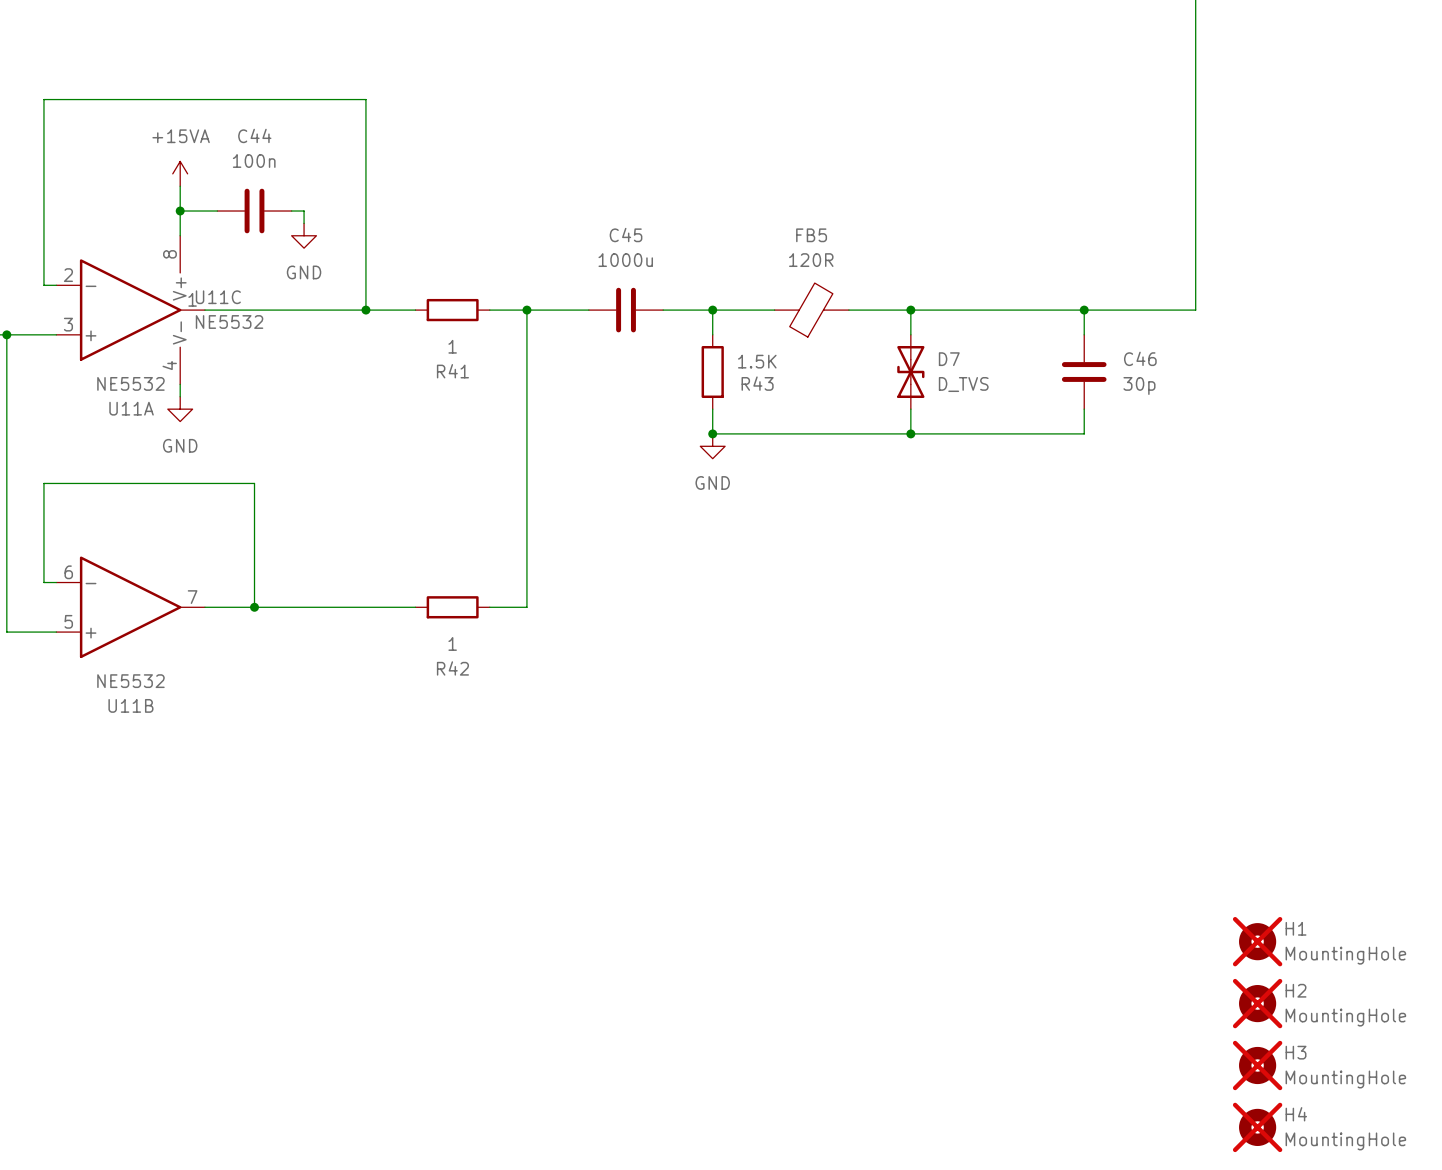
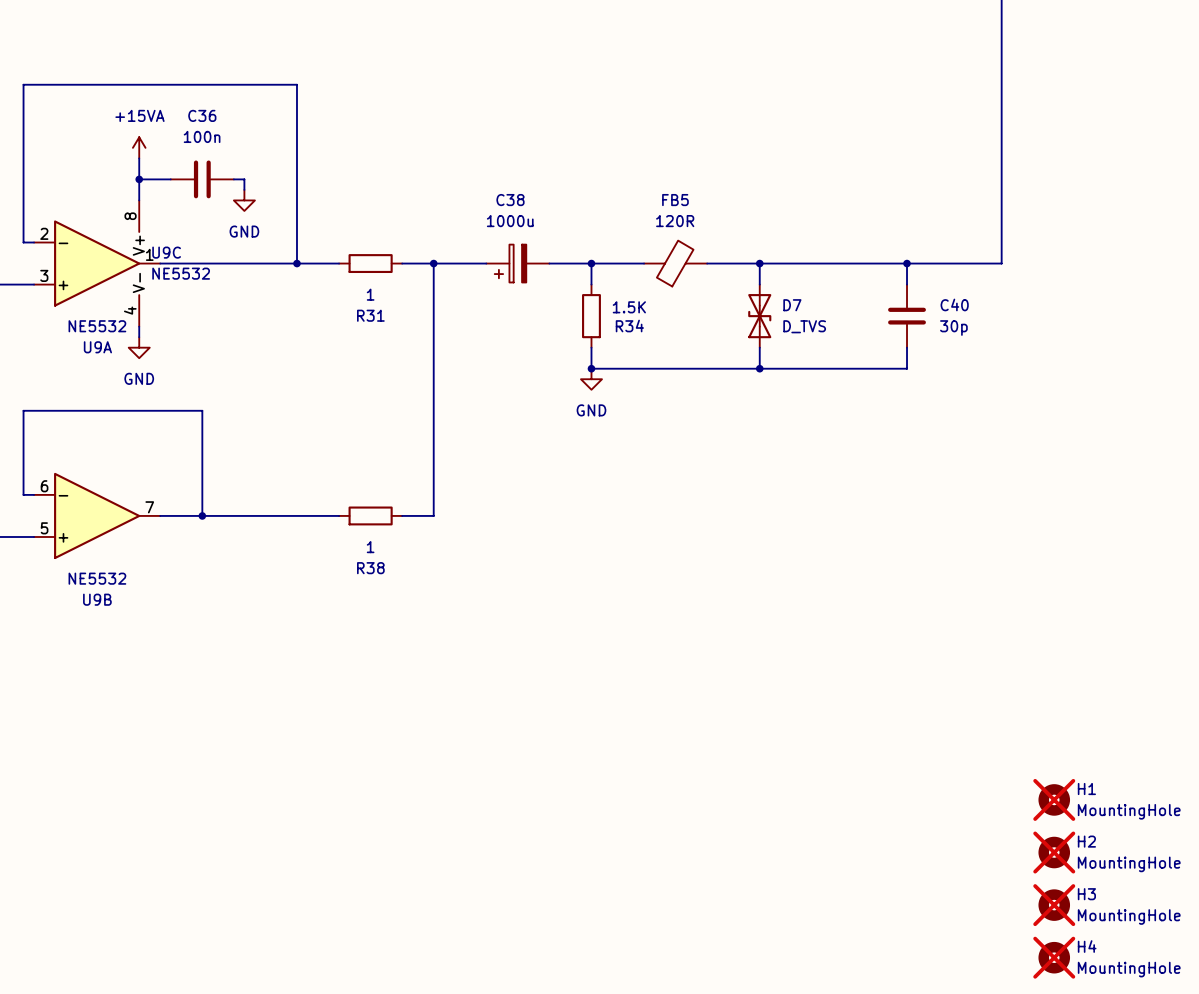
C44 name: C44 (254, 135) -> C36 (202, 115)
U11C name: U11C (218, 297) -> U9C (166, 252)
C45: 1000u (626, 310) -> none
C38: none -> 1000u (517, 263)
C46 name: C46 (1140, 358) -> C40 (954, 304)
R41 name: R41 (452, 371) -> R31 (370, 315)
R43 name: R43 (757, 383) -> R34 (629, 326)
U11A name: U11A (131, 408) -> U9A (97, 347)
R42 name: R42 (452, 668) -> R38 (370, 568)
U11B name: U11B (130, 705) -> U9B (97, 599)

